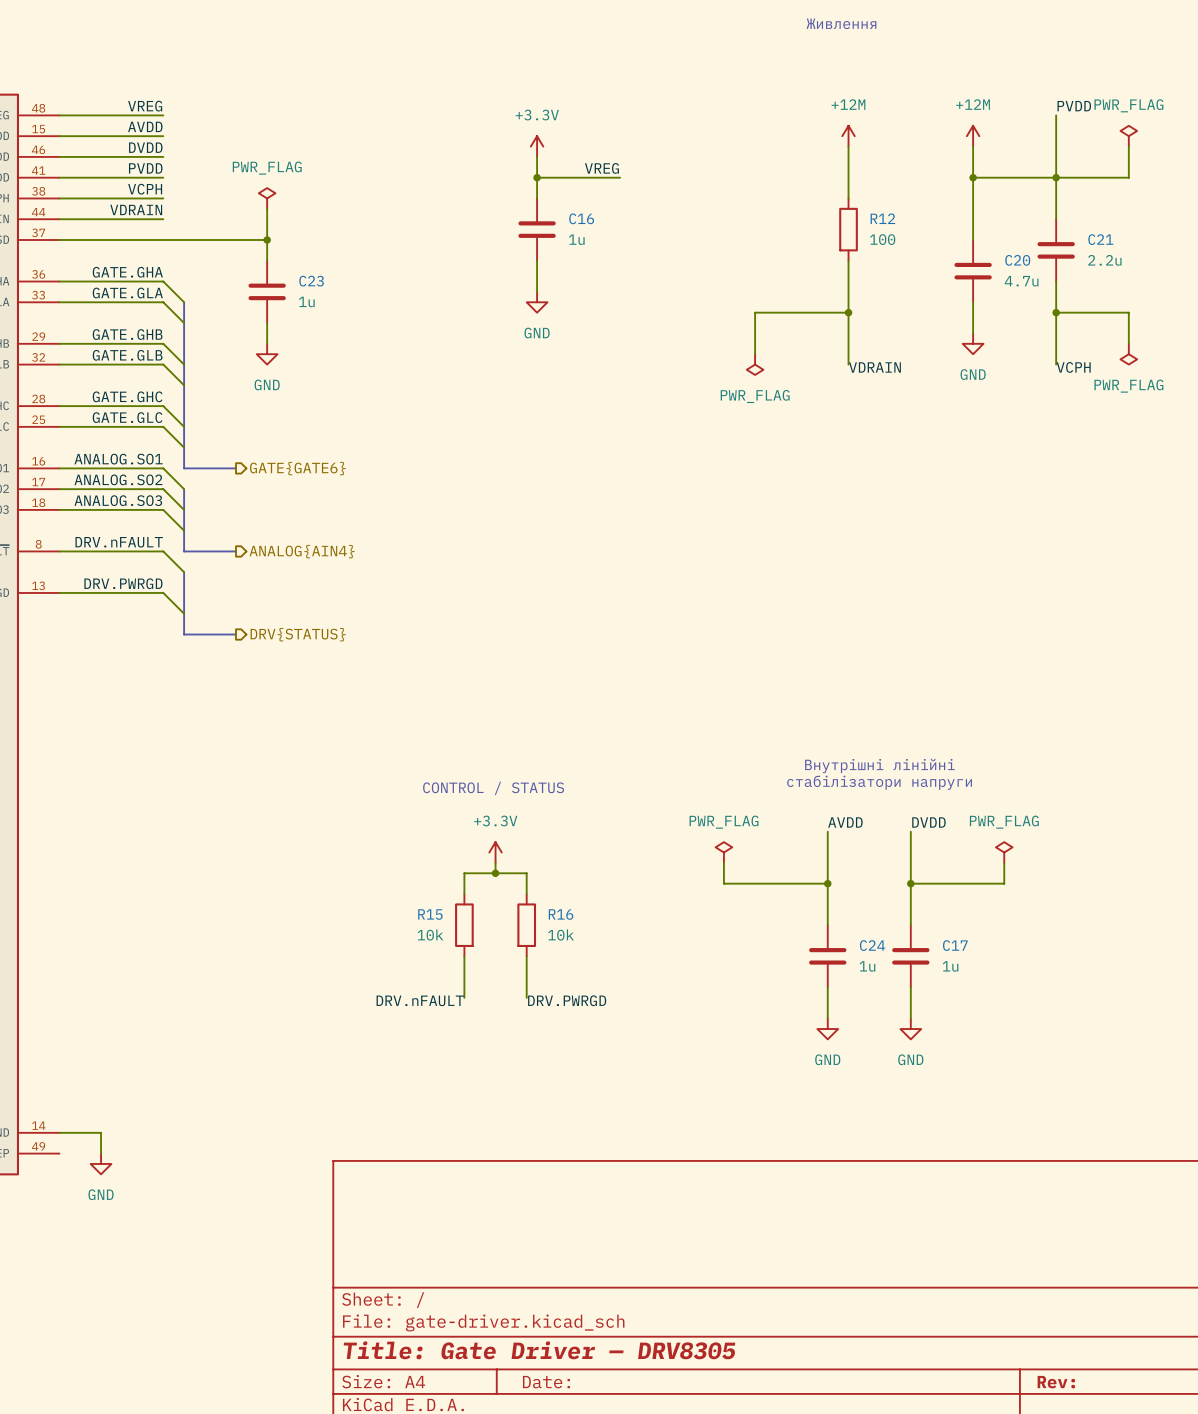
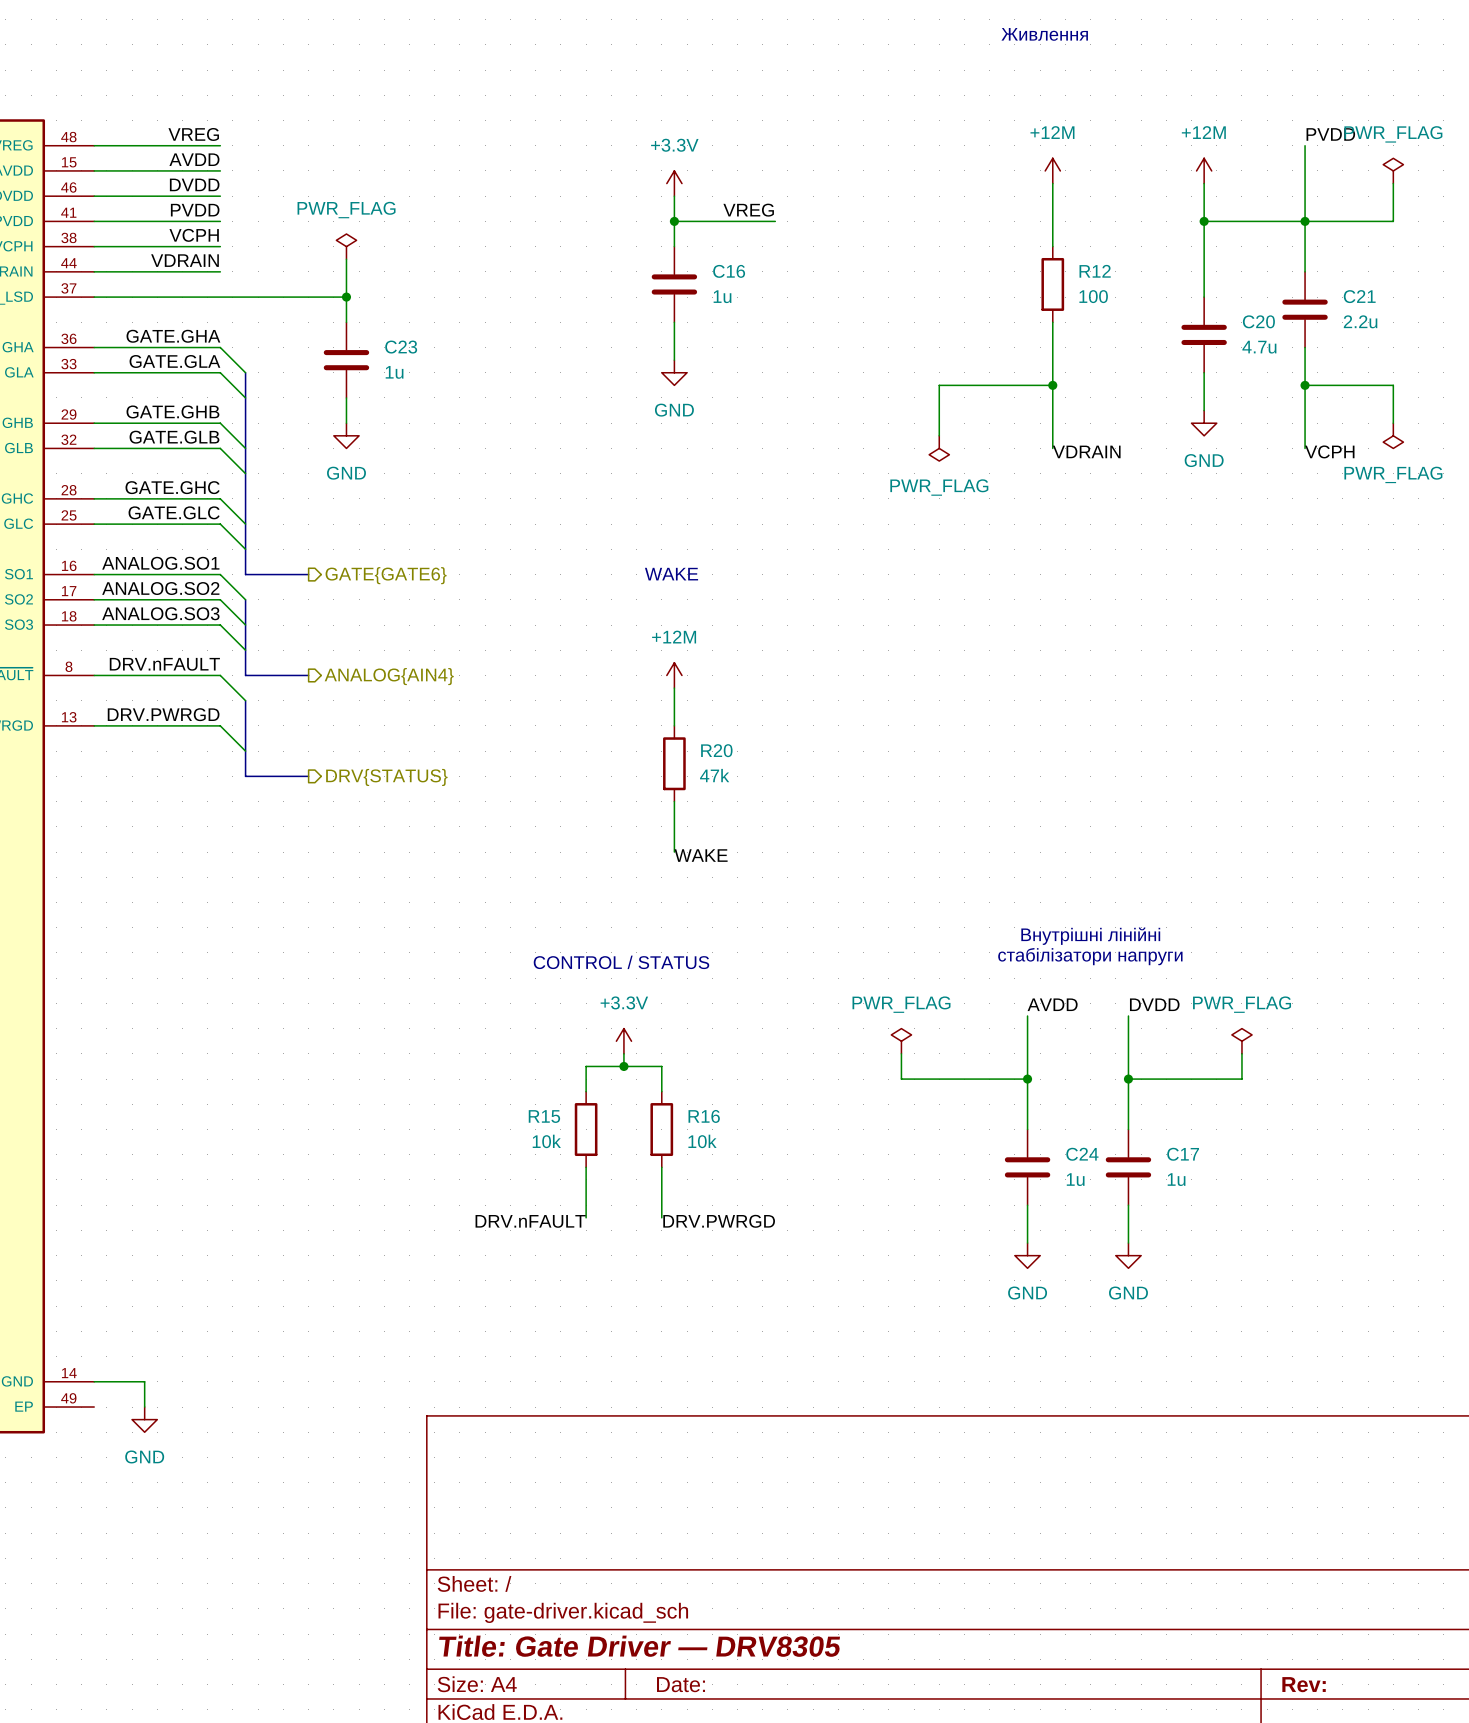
text: none -> WAKE (671, 574)
power symbol: none -> +12M (674, 675)
wire: none -> (674, 688) (674, 725)
R20: none -> 47k (674, 763)
wire: none -> (674, 801) (674, 852)
label: none -> WAKE (701, 855)

